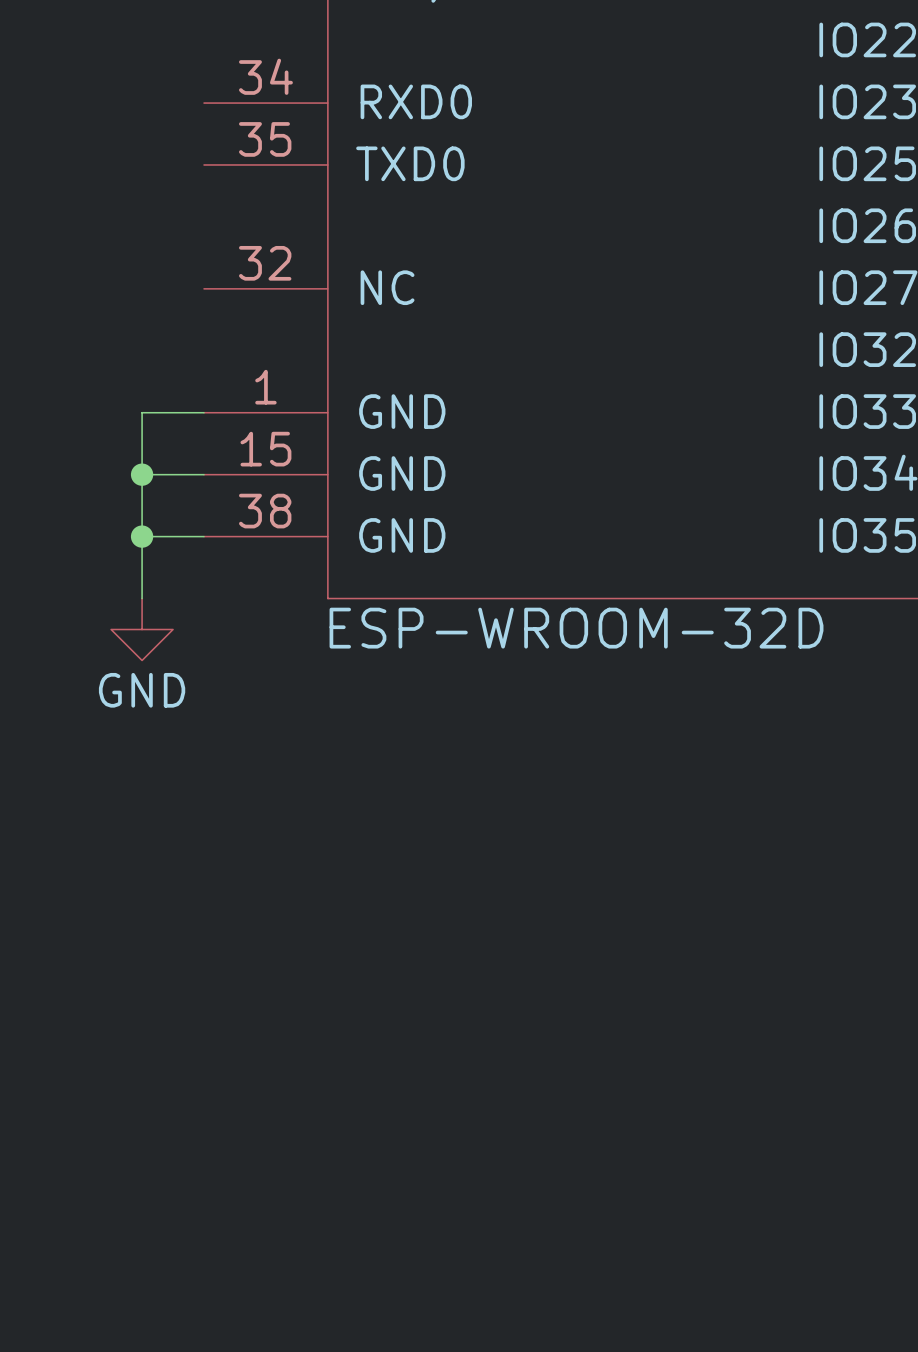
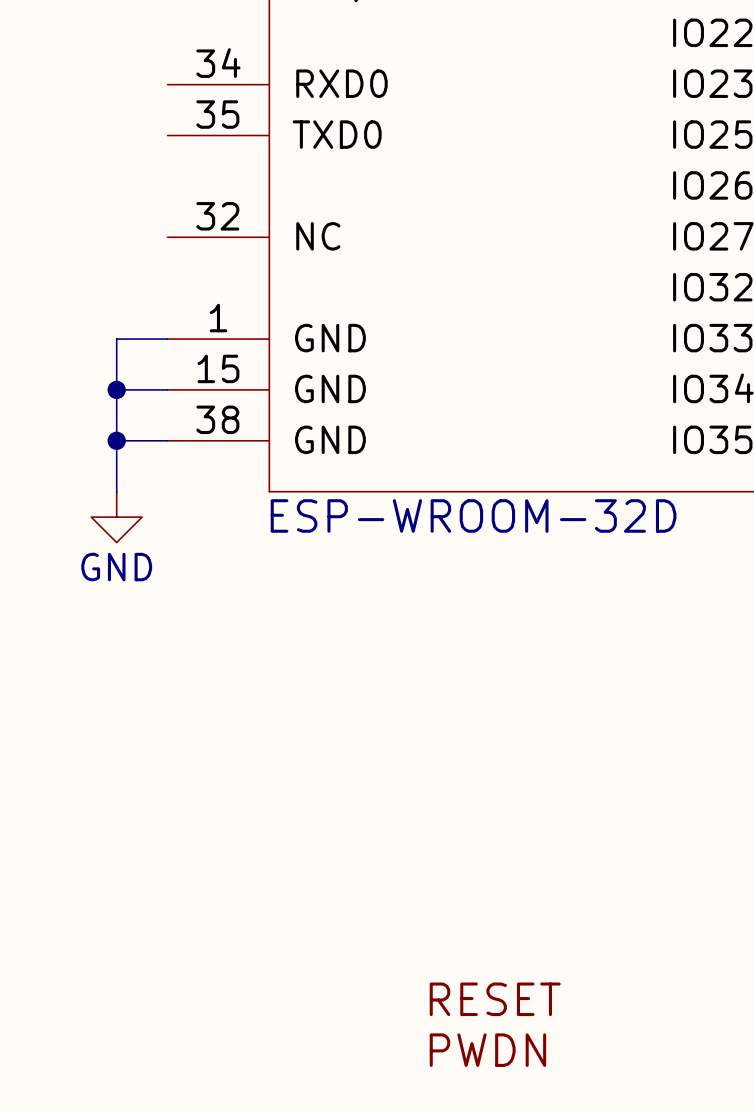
label: none -> RESET (495, 999)
label: none -> PWDN (487, 1050)

